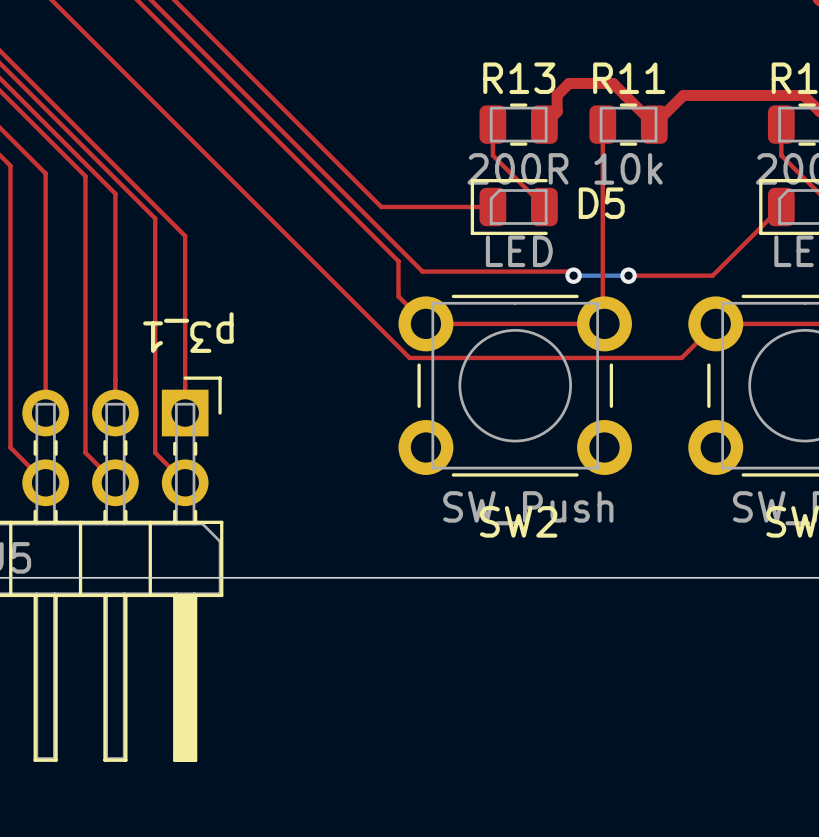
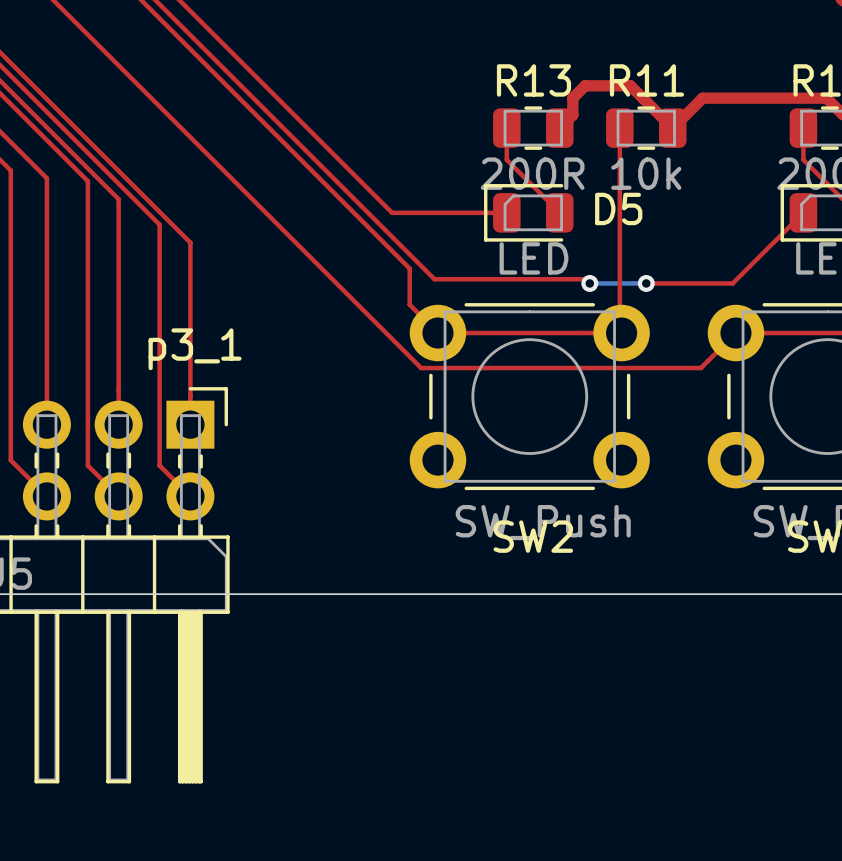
text rotation: 0° (188, 332) -> 180° (195, 349)

